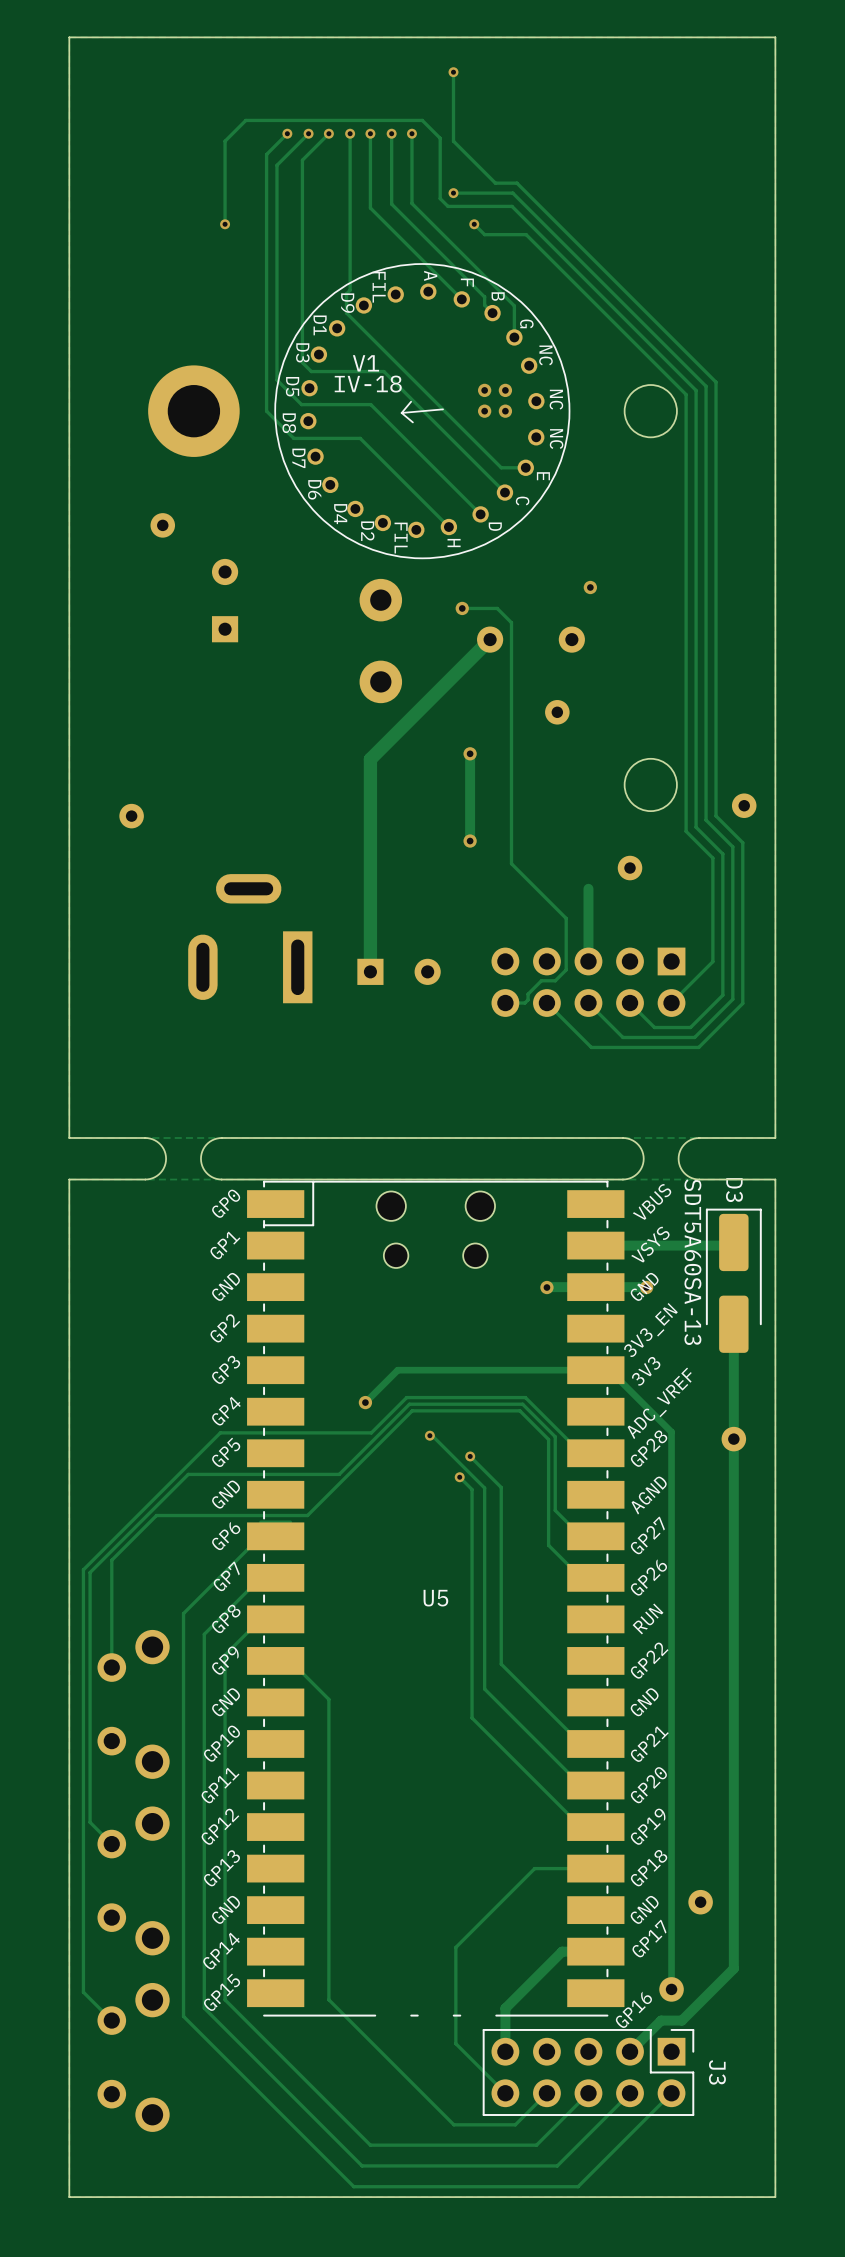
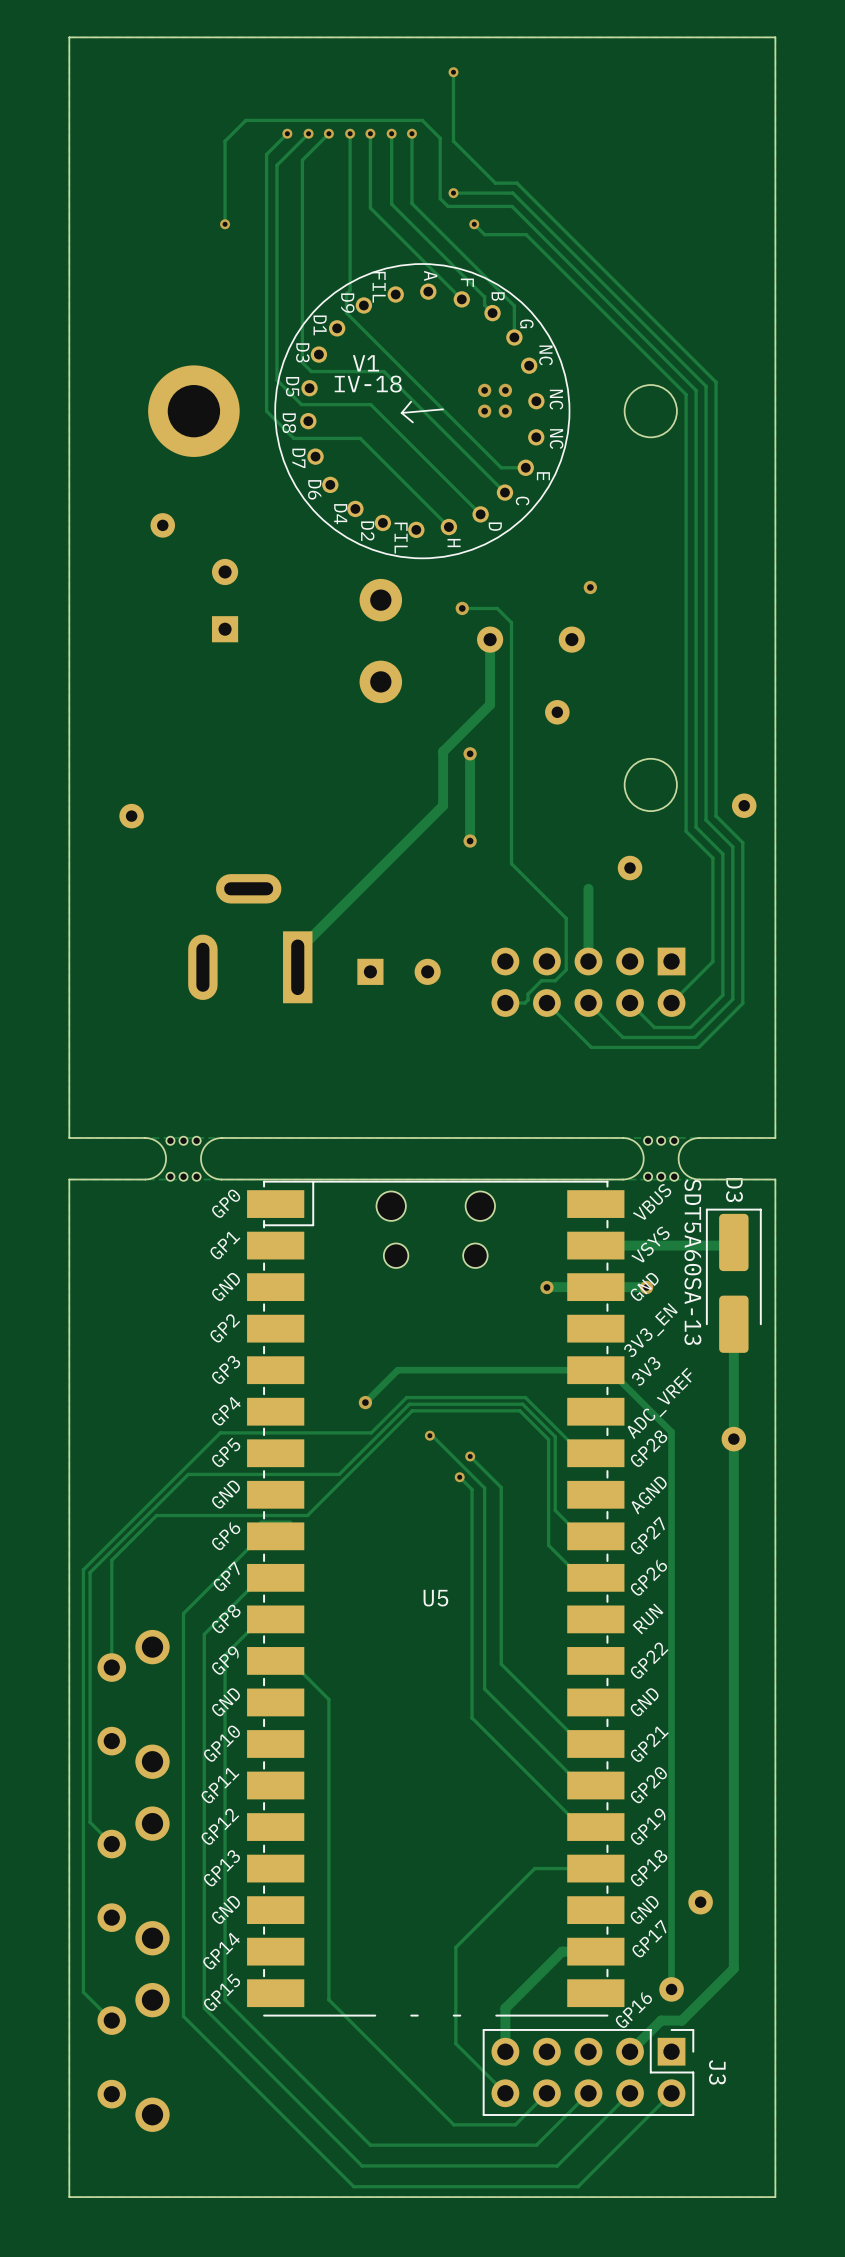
track: (490, 639) (370, 759) (370, 971) -> (490, 639) (490, 704) (443, 751) (443, 805) (297, 951)
part: none -> (183, 1158)
part: none -> (661, 1158)

